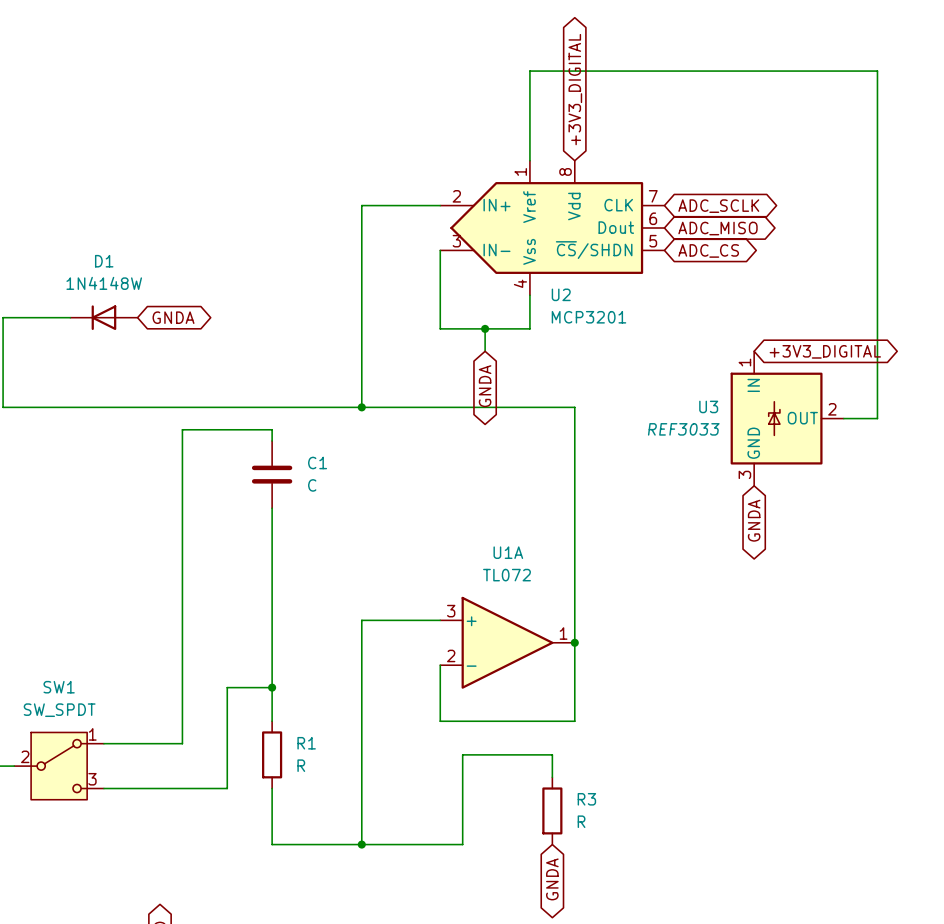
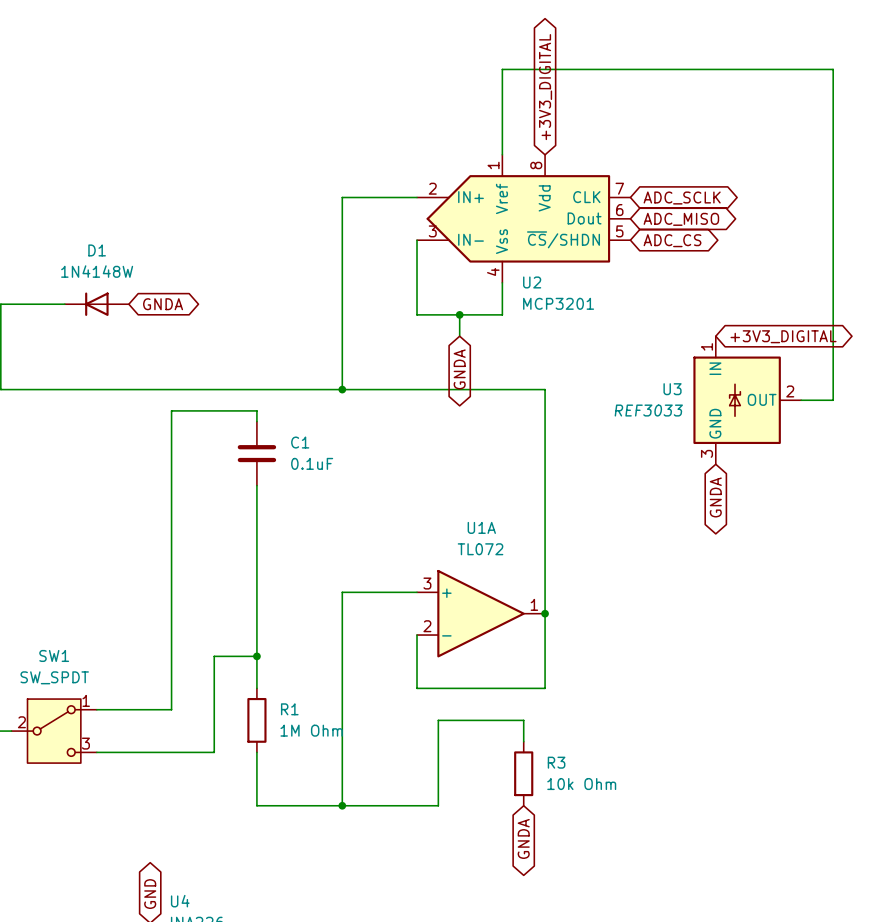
C1 value: C (312, 485) -> 0.1uF (312, 463)
R1 value: R (301, 765) -> 1M Ohm (311, 730)
R3 value: R (581, 821) -> 10k Ohm (581, 784)

